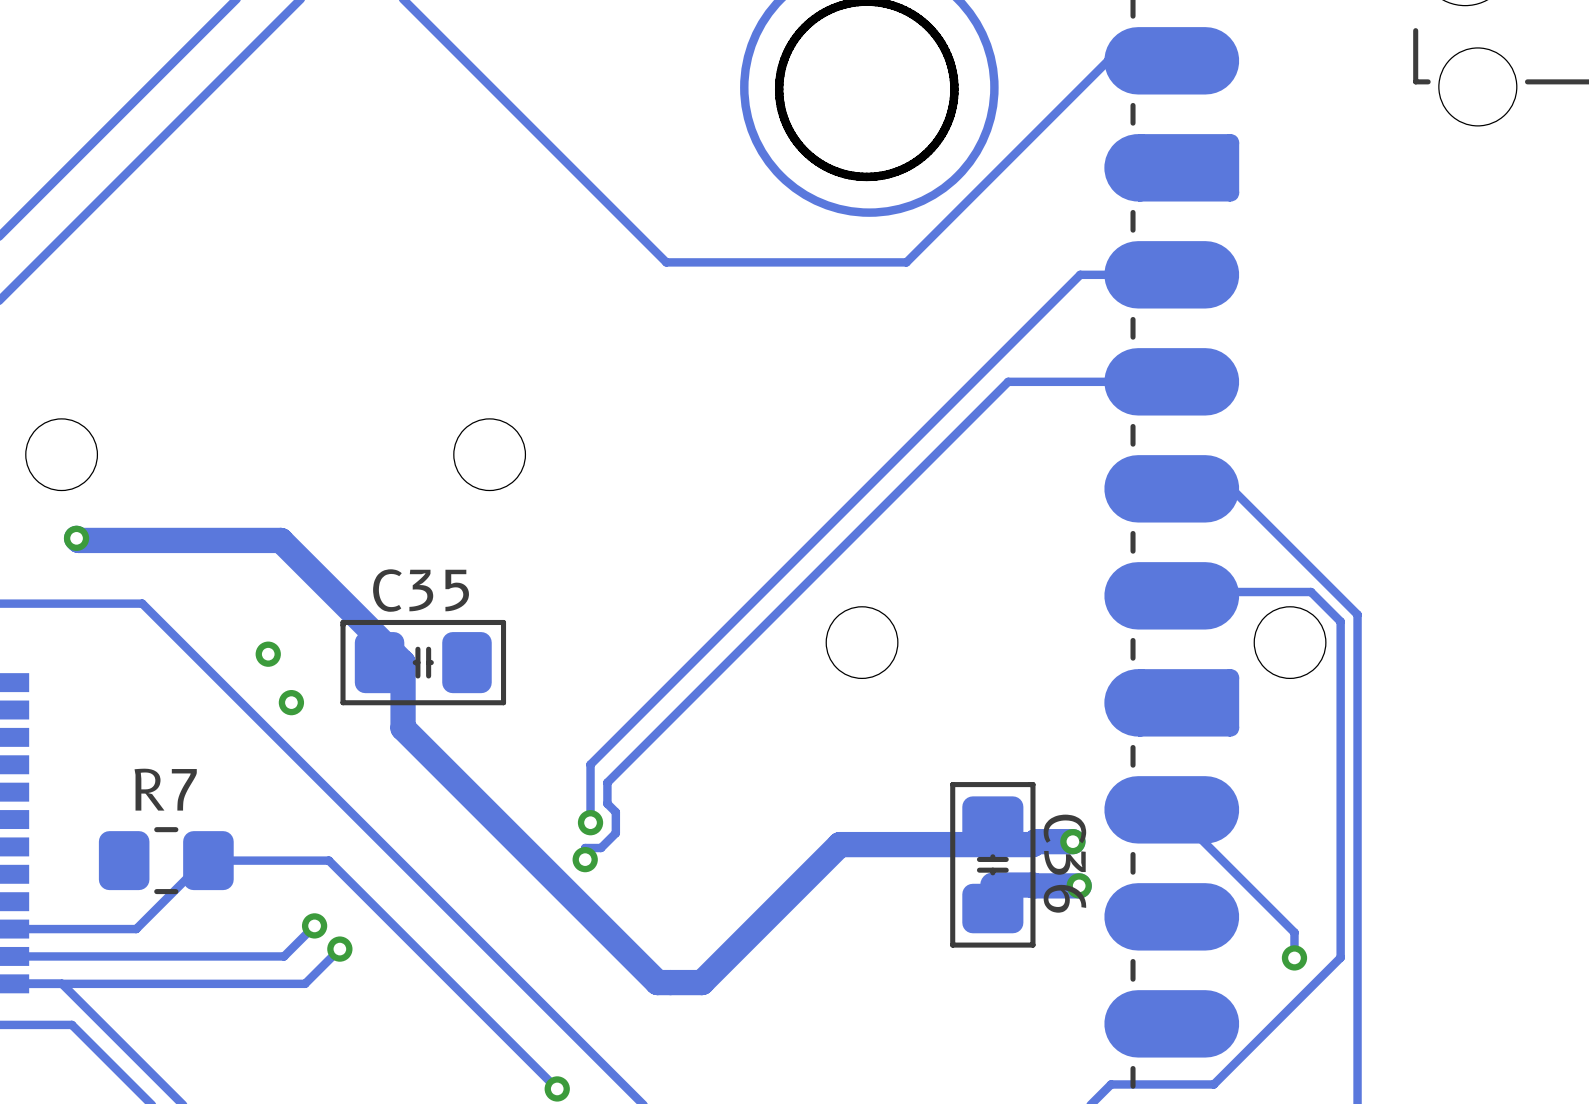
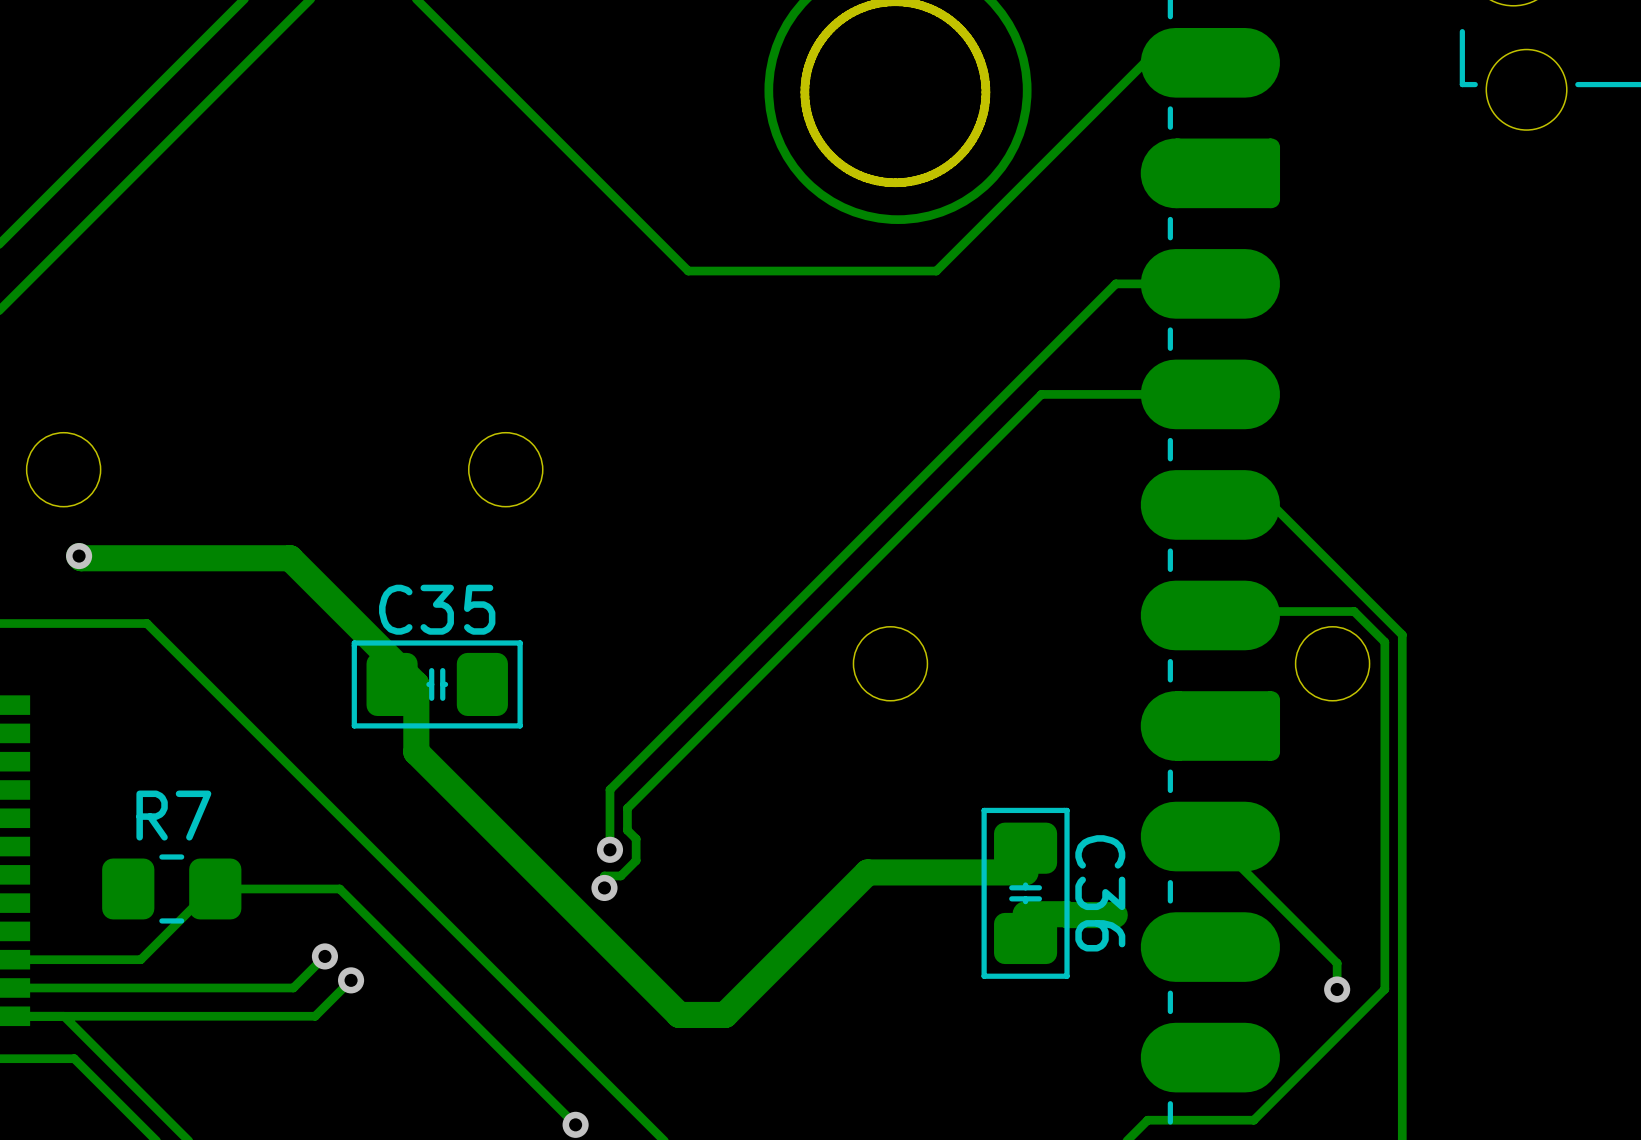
via: (268, 654) -> none
via: (291, 702) -> none
track: (1072, 841) (992, 844) -> none
via: (1072, 841) -> none
via: (1079, 885) -> none

